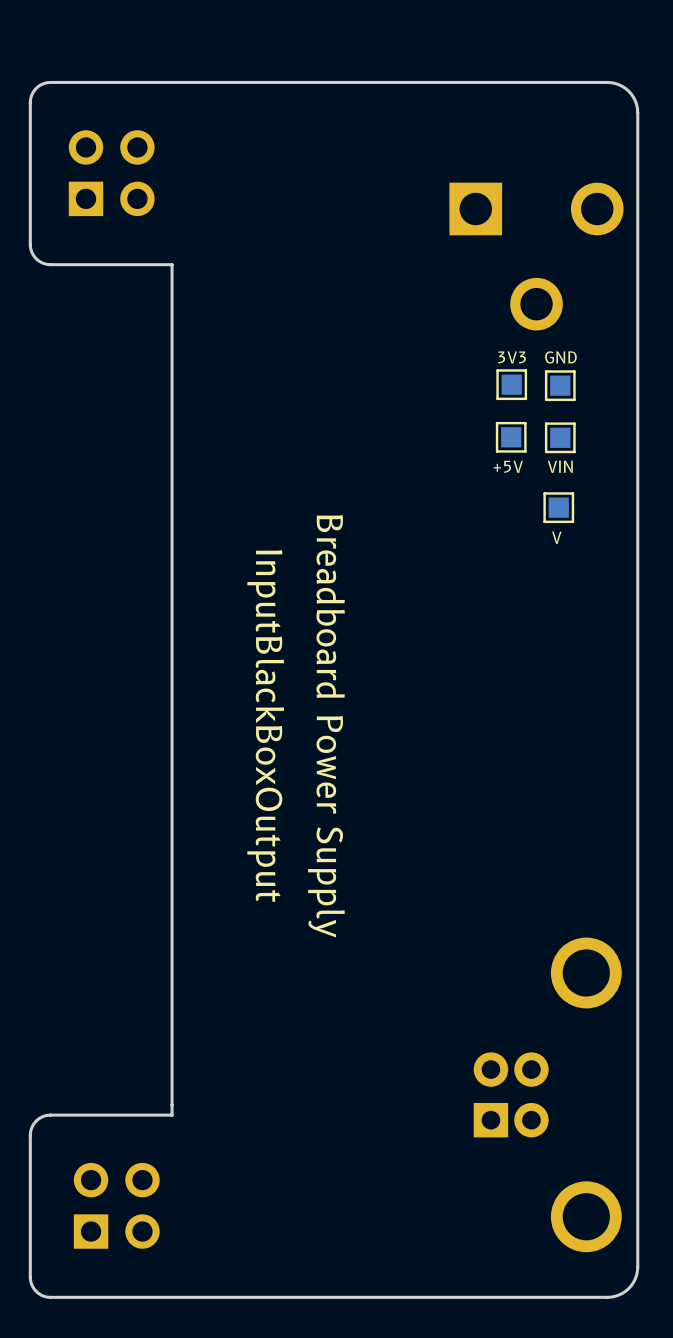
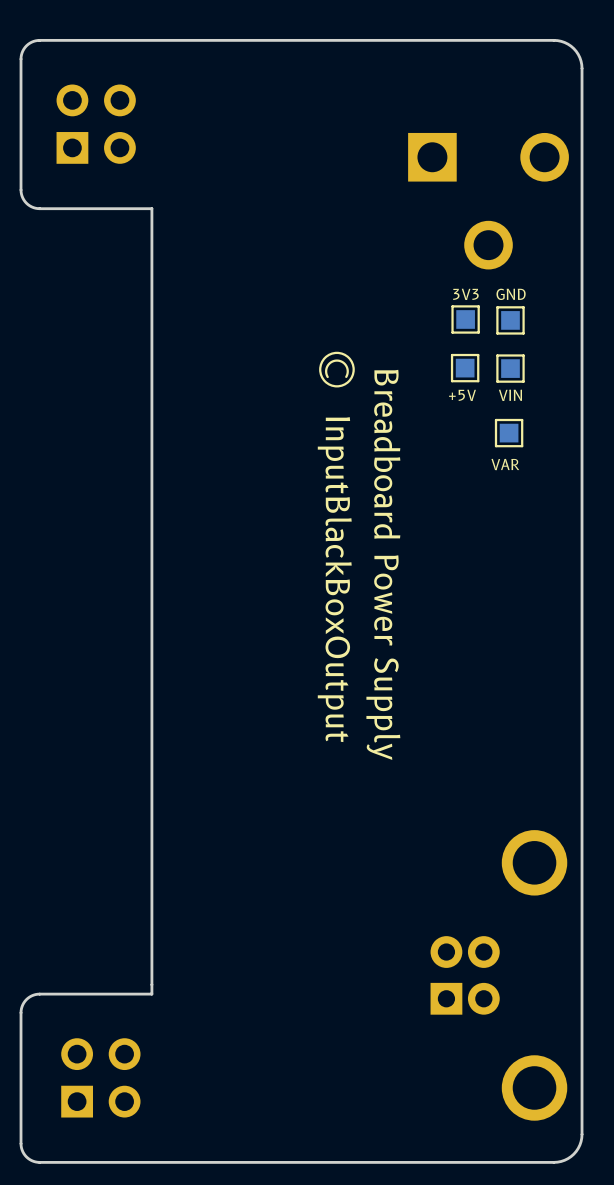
drawing: none -> [319, 351, 355, 388]
line: none -> (346, 376) (347, 371) (345, 365) (336, 360) (327, 365) (326, 370) (327, 376)
text: V (556, 537) -> VAR (505, 464)
text position: InputBlackBoxOutput (265, 726) -> InputBlackBoxOutput (334, 579)
text position: Breadboard Power Supply (326, 726) -> Breadboard Power Supply (383, 564)

